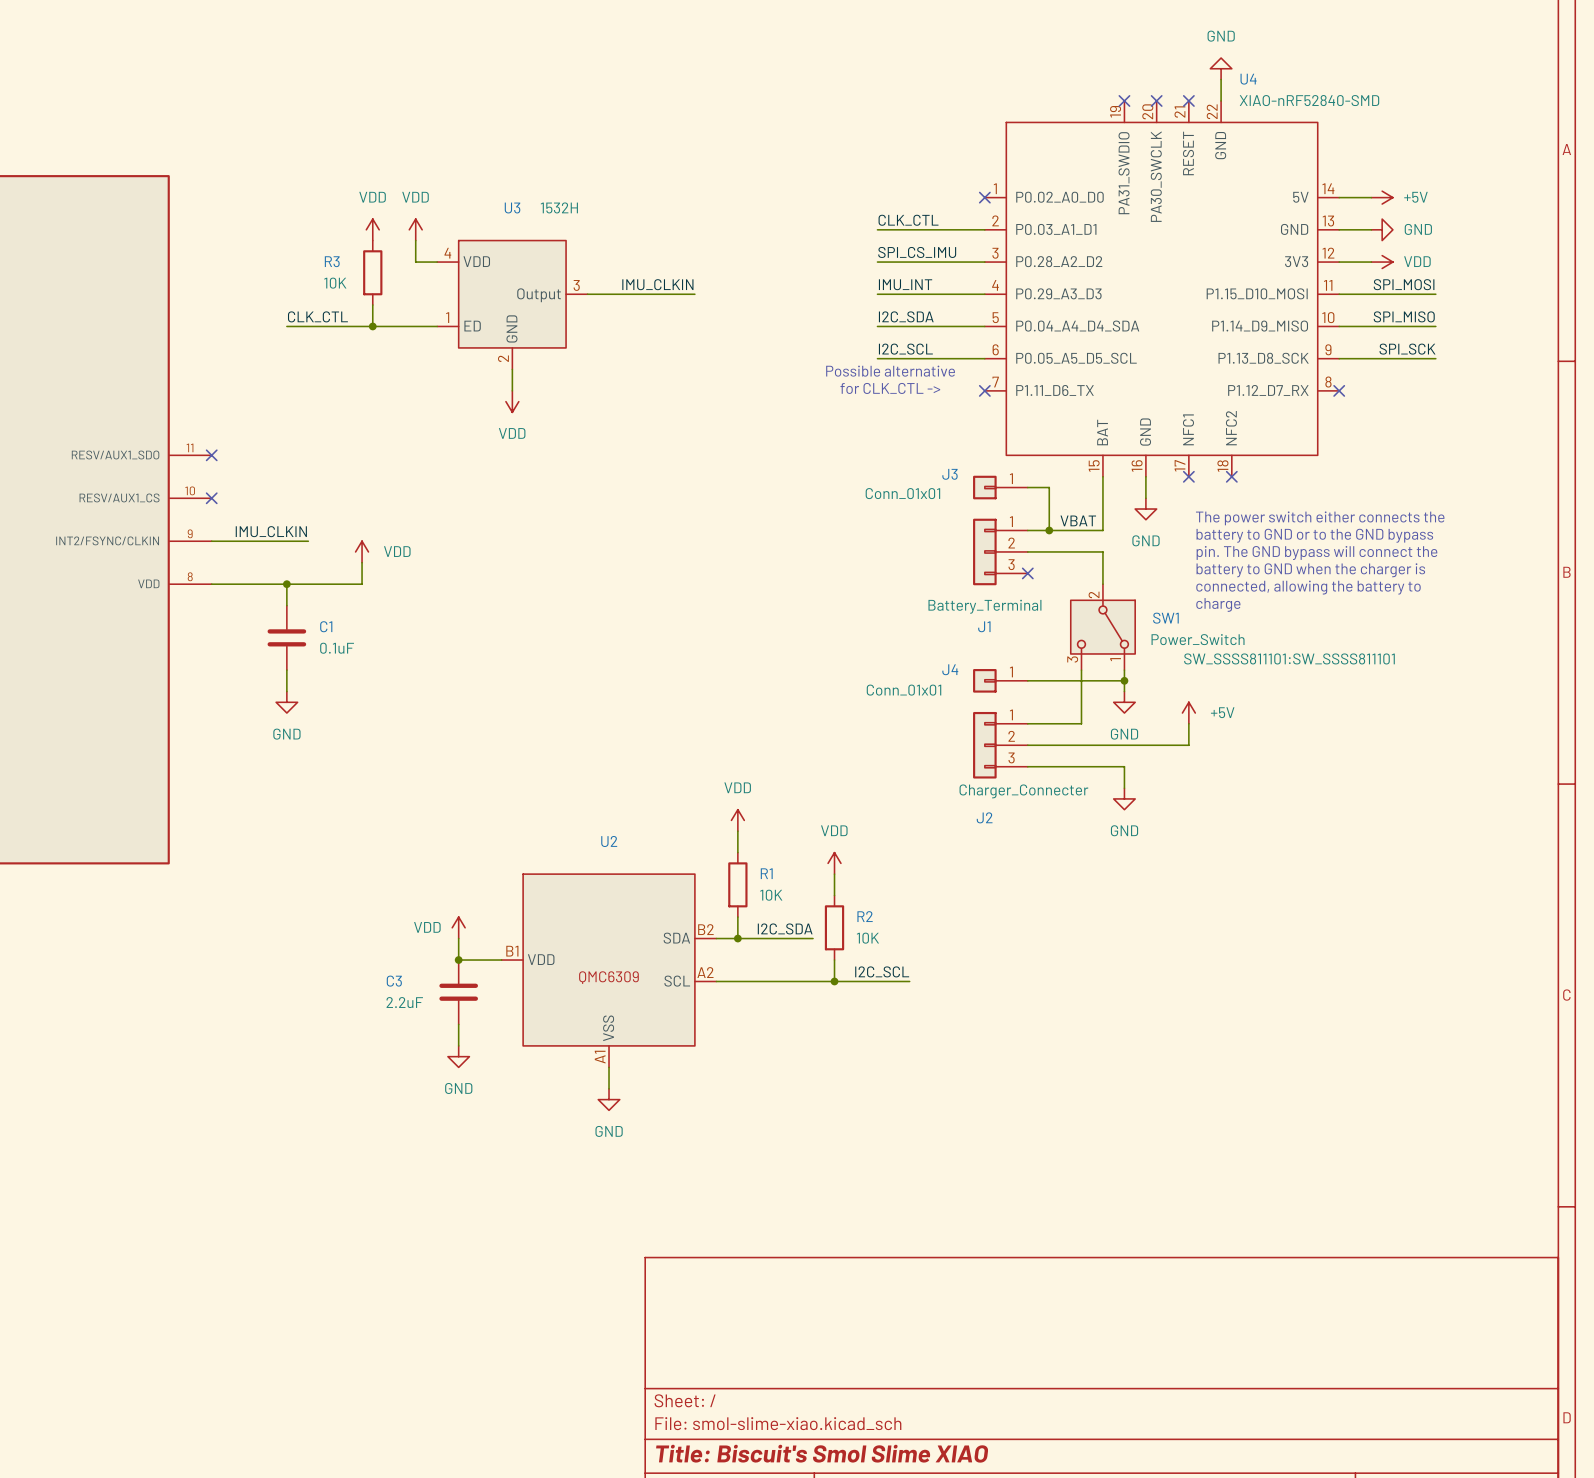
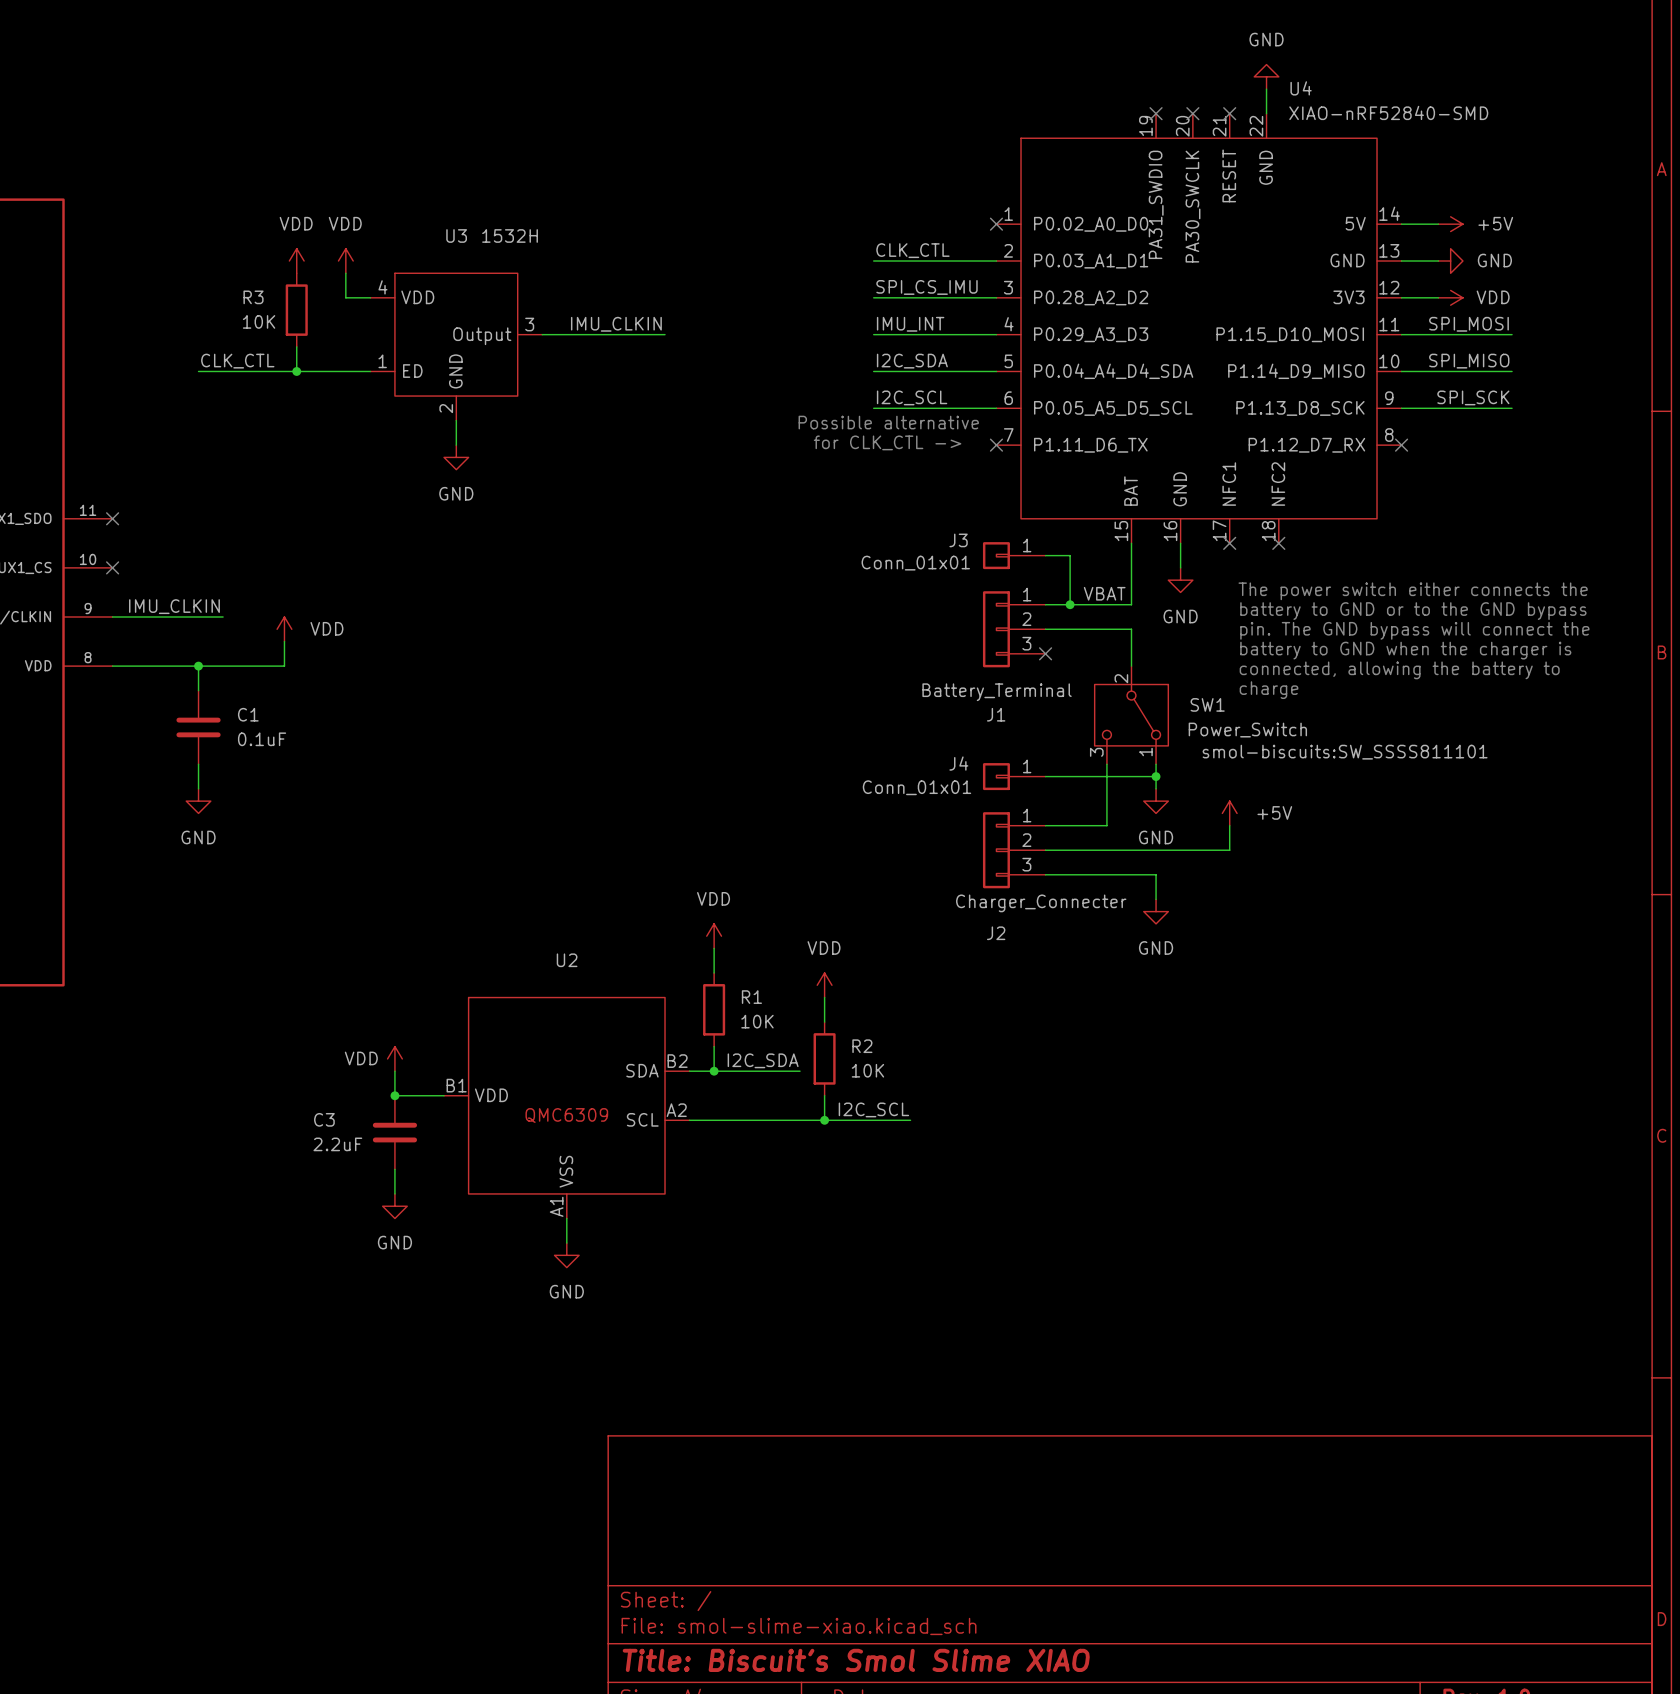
power symbol: VDD (512, 401) -> GND (456, 457)
SW1 text: SW_SSSS811101:SW_SSSS811101 (1289, 658) -> smol-biscuits:SW_SSSS811101 (1345, 752)

